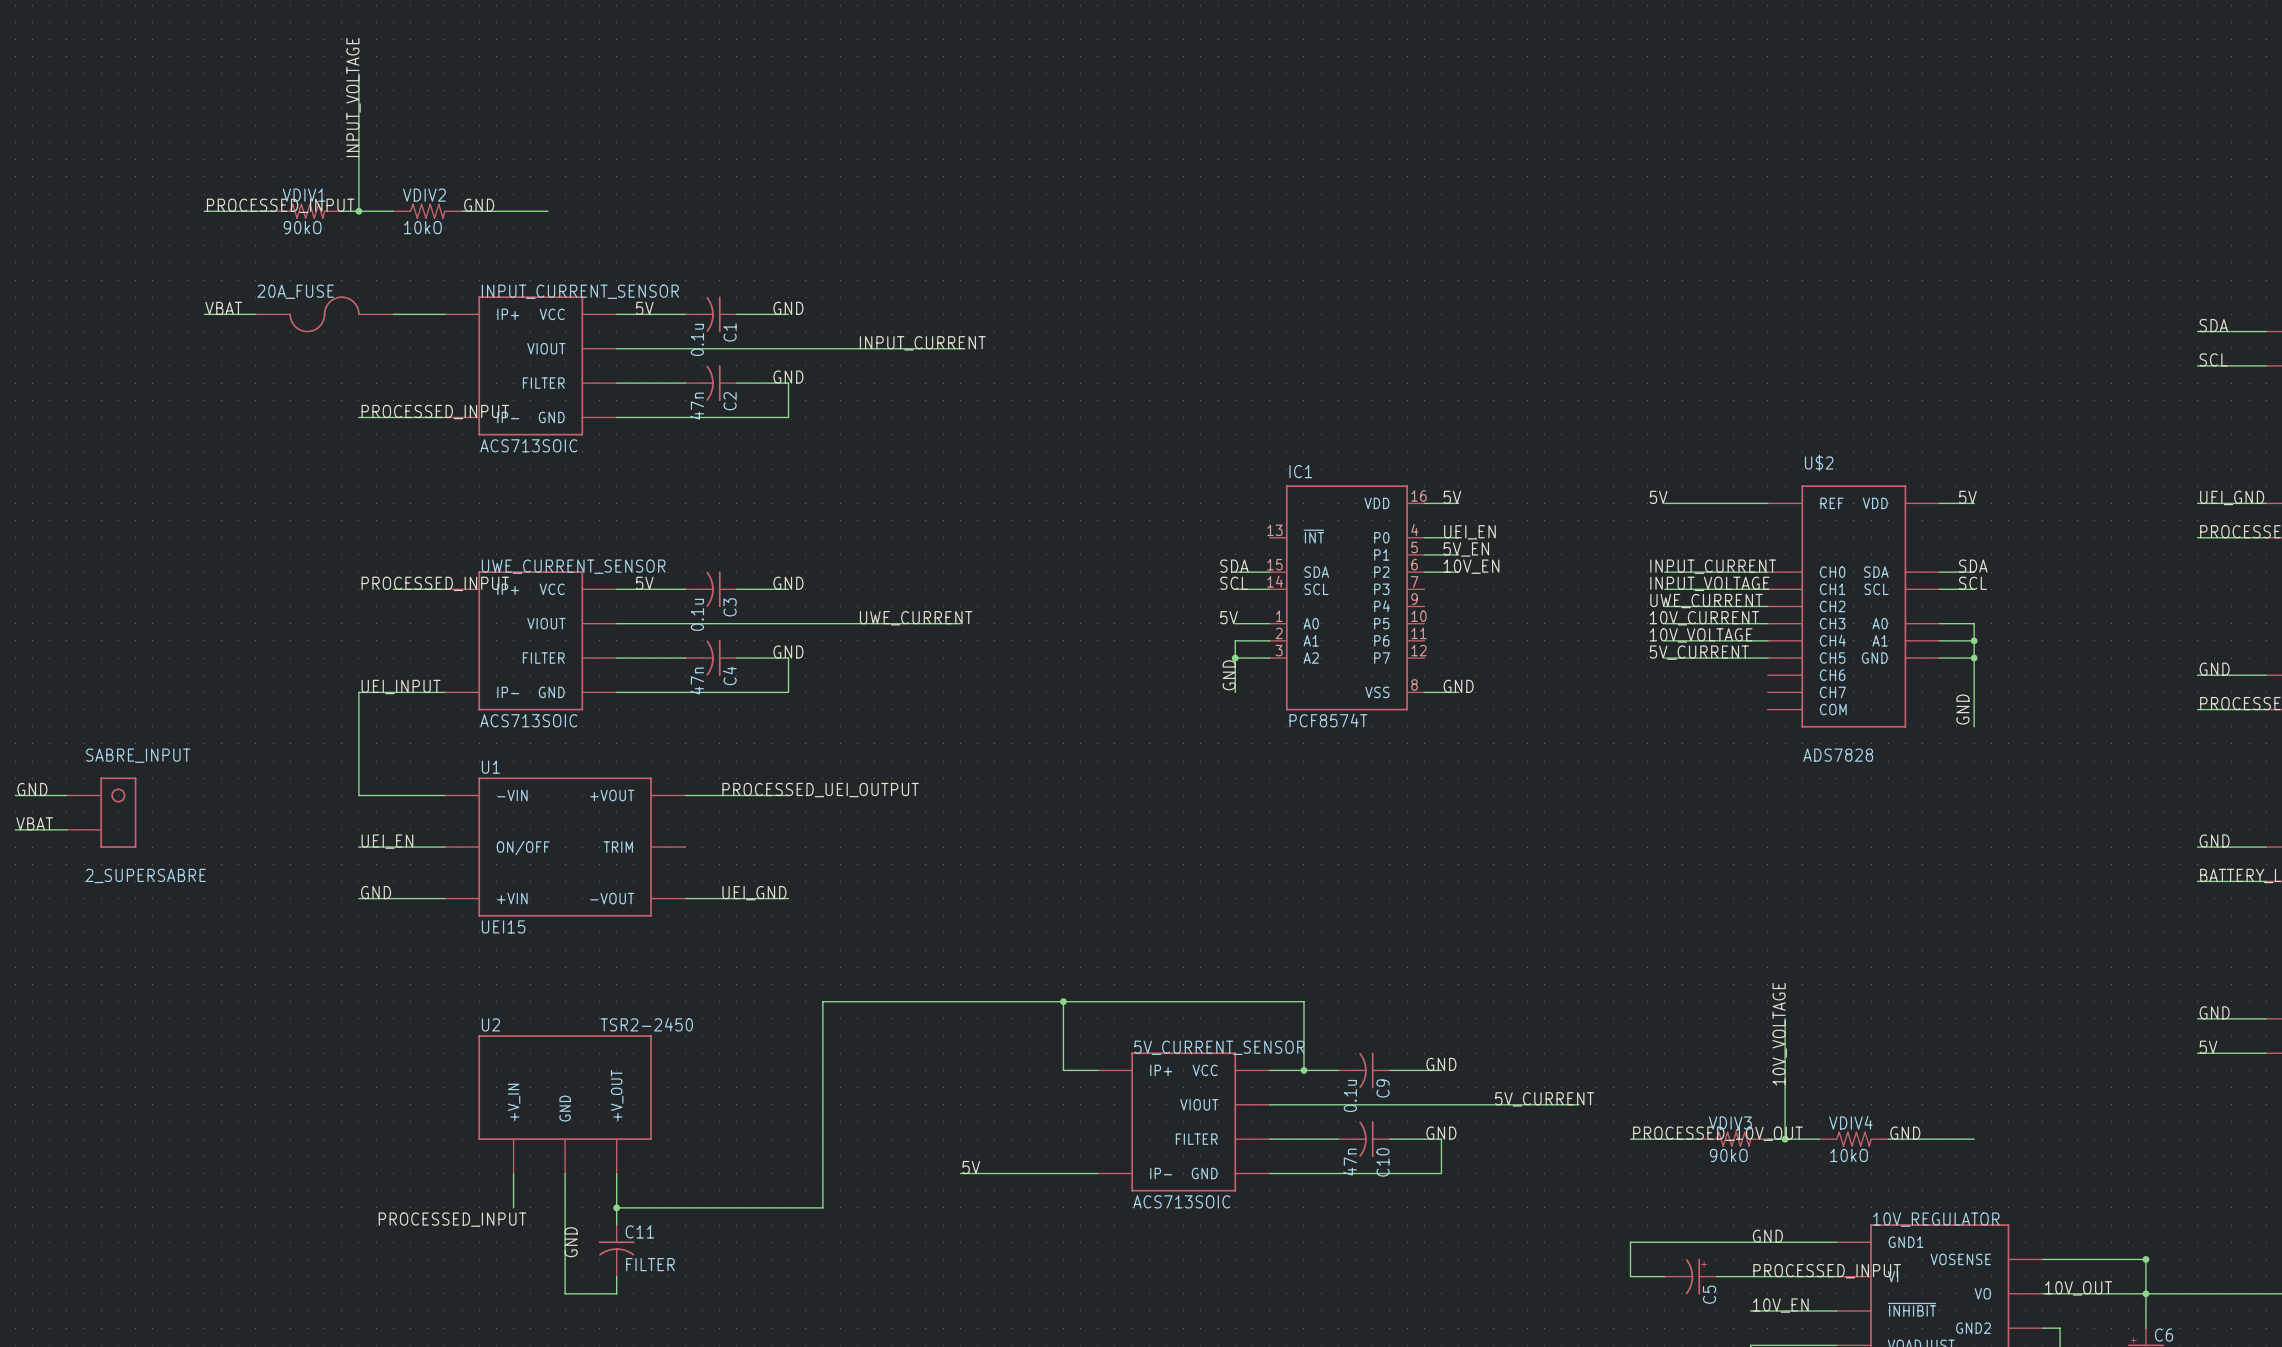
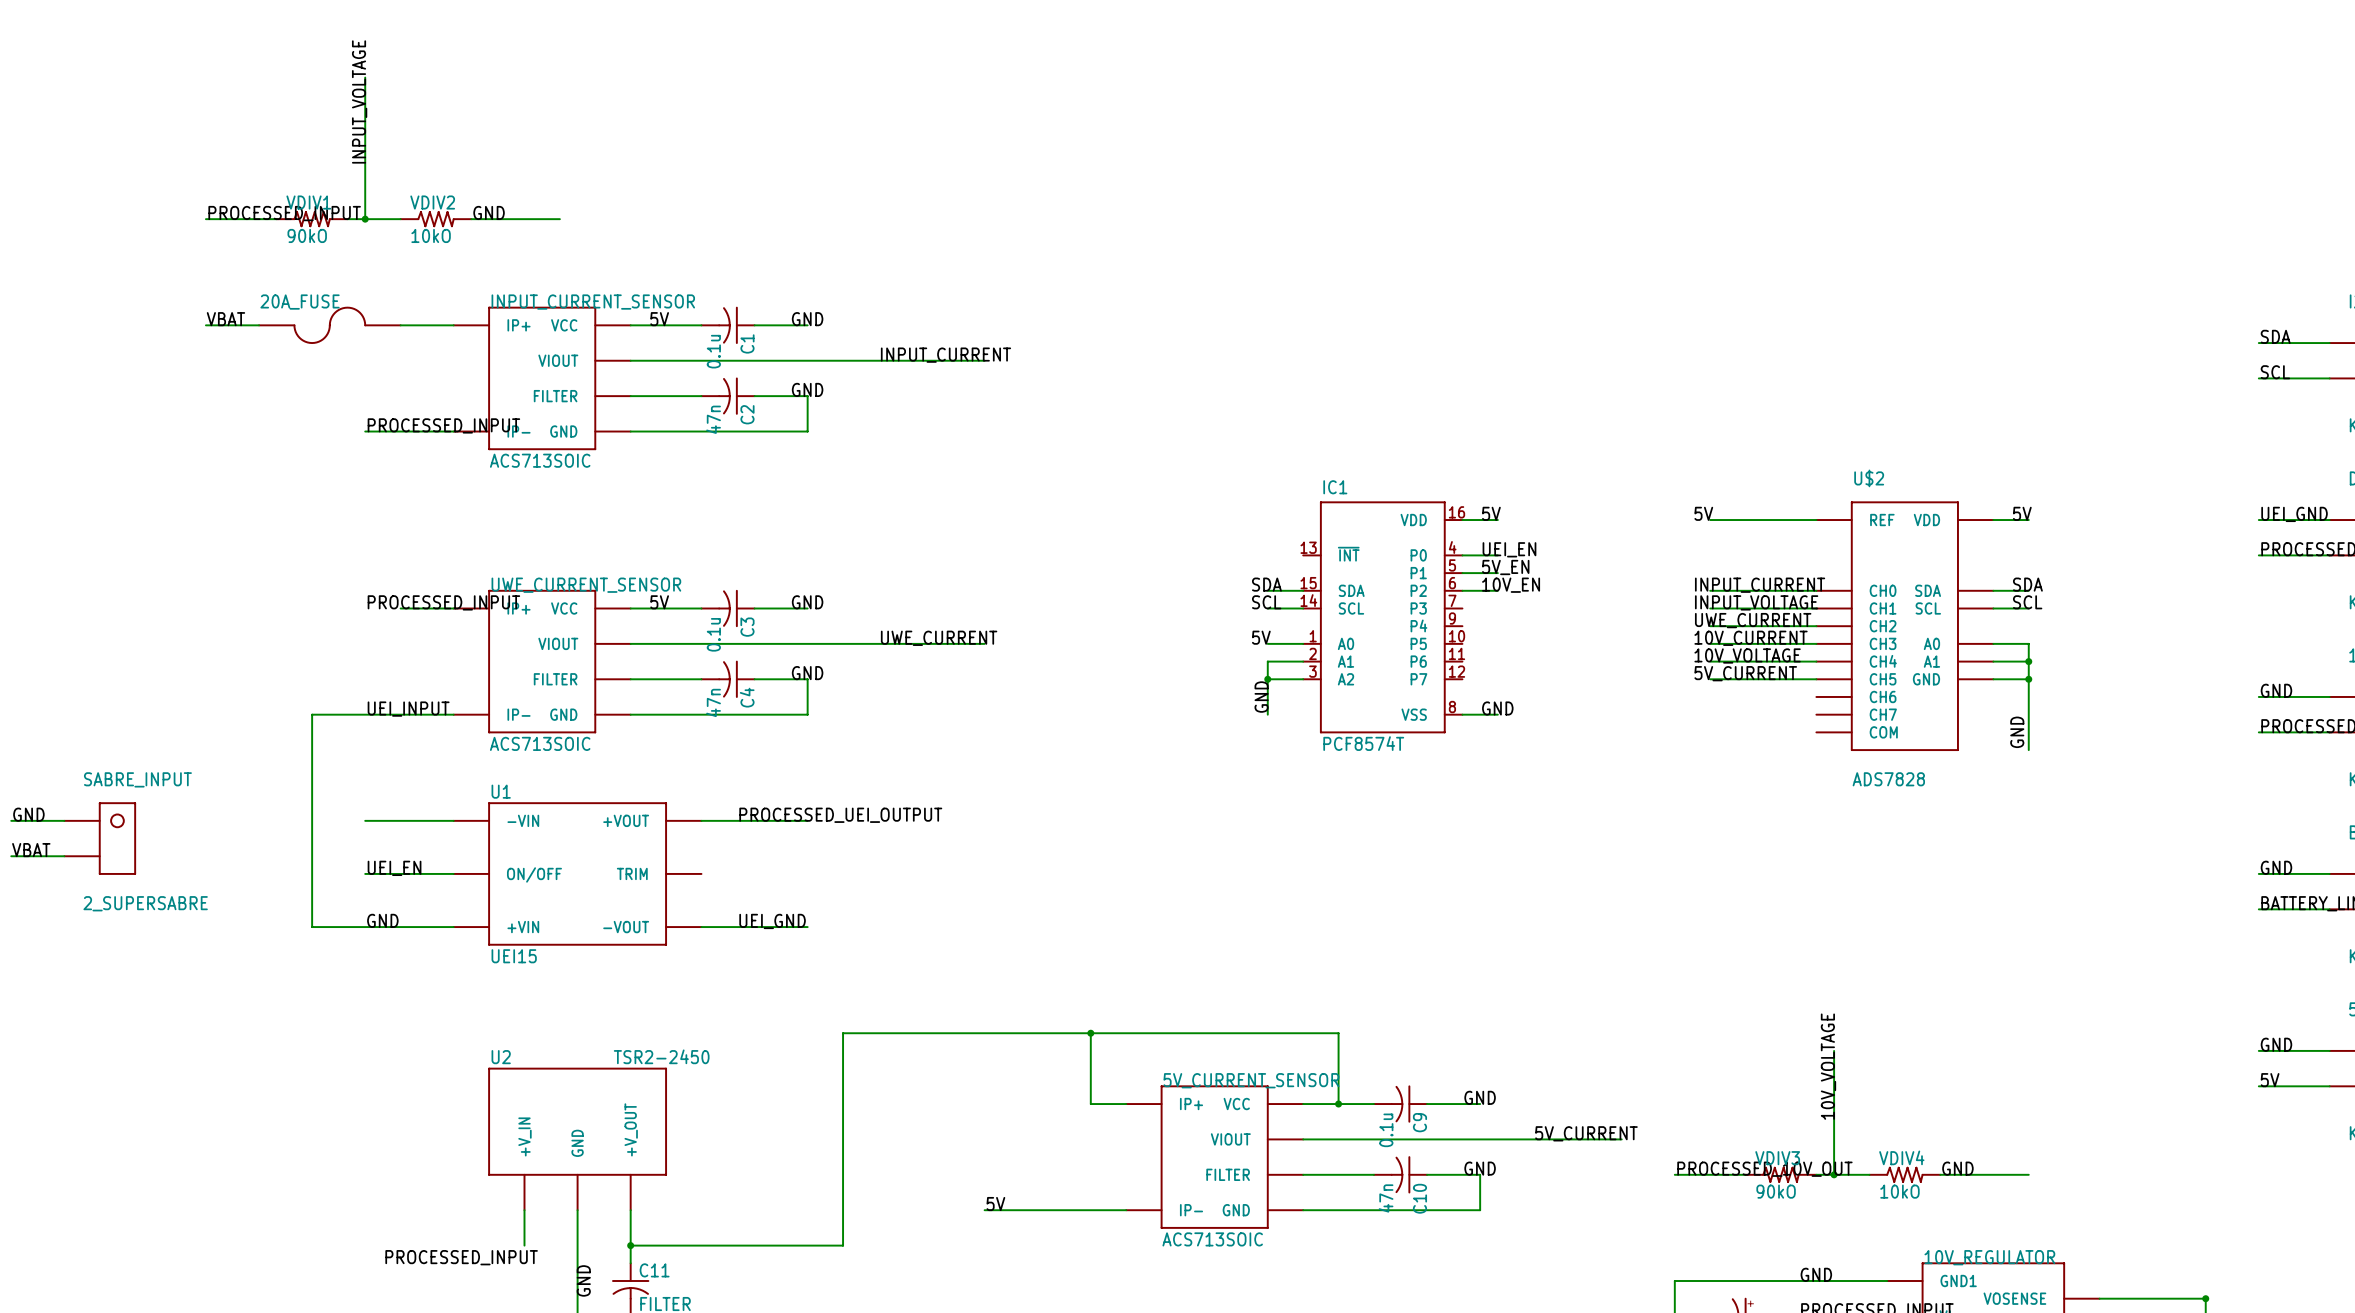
wire: (358, 692) (358, 795) -> (365, 714) (312, 714) (312, 927) (365, 927)

